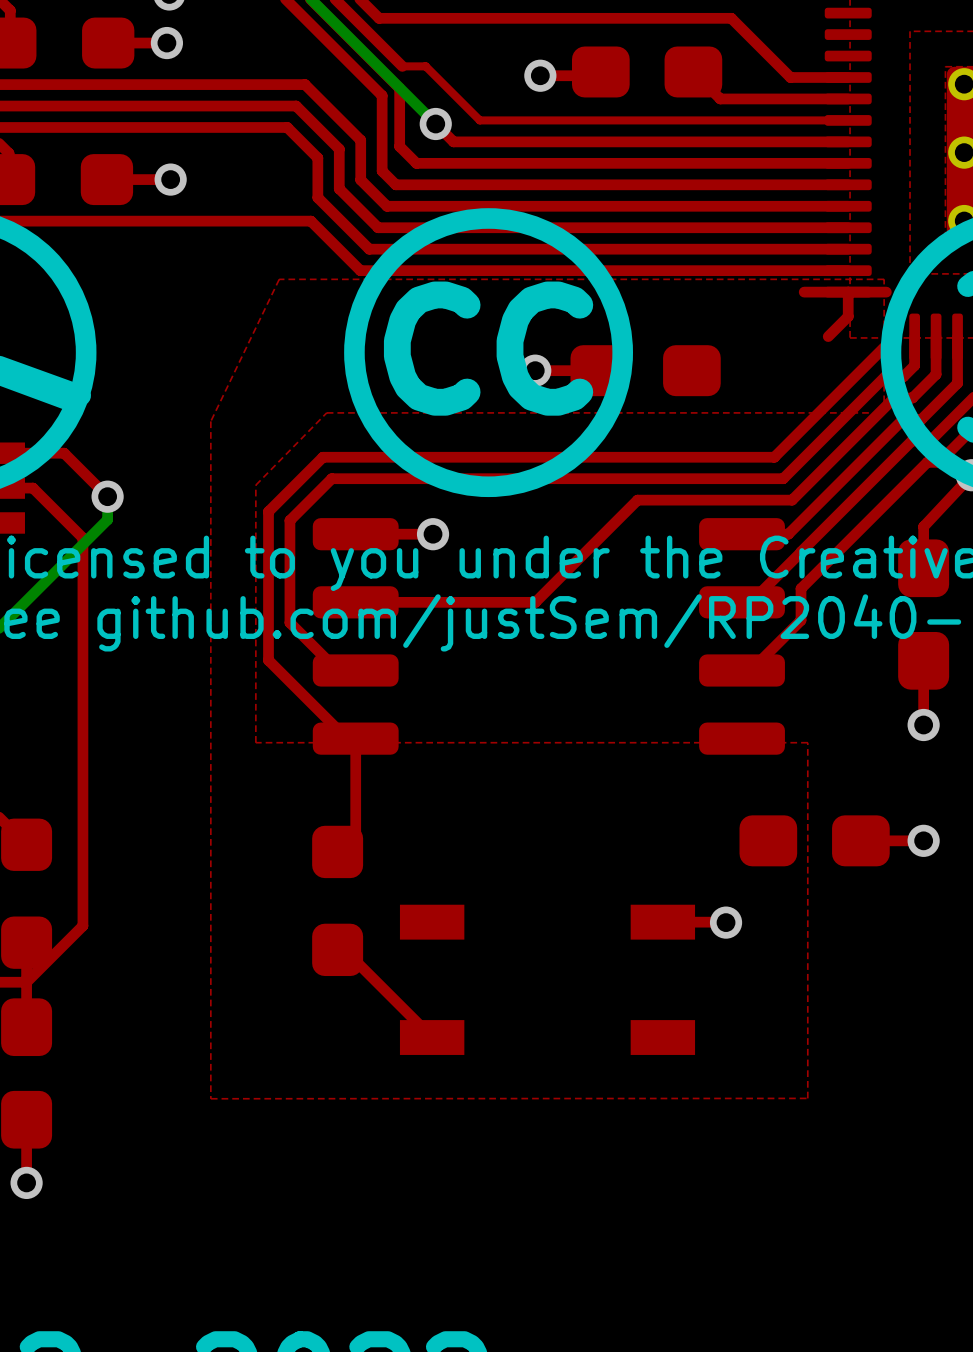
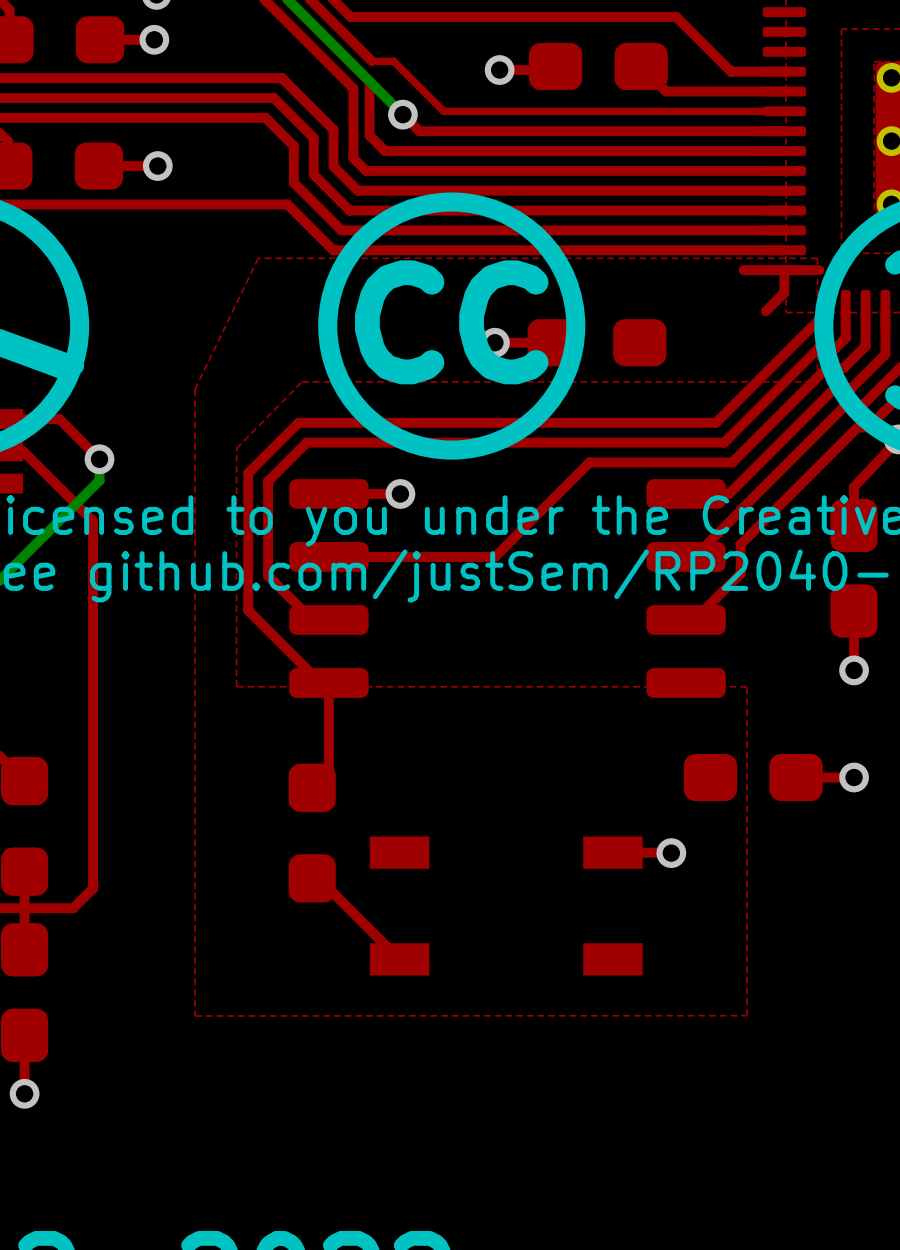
top track: (25, 488) (32, 488) (82, 538) (82, 925) (26, 982) -> (23, 451) (93, 521) (93, 888) (73, 908) (24, 908)

